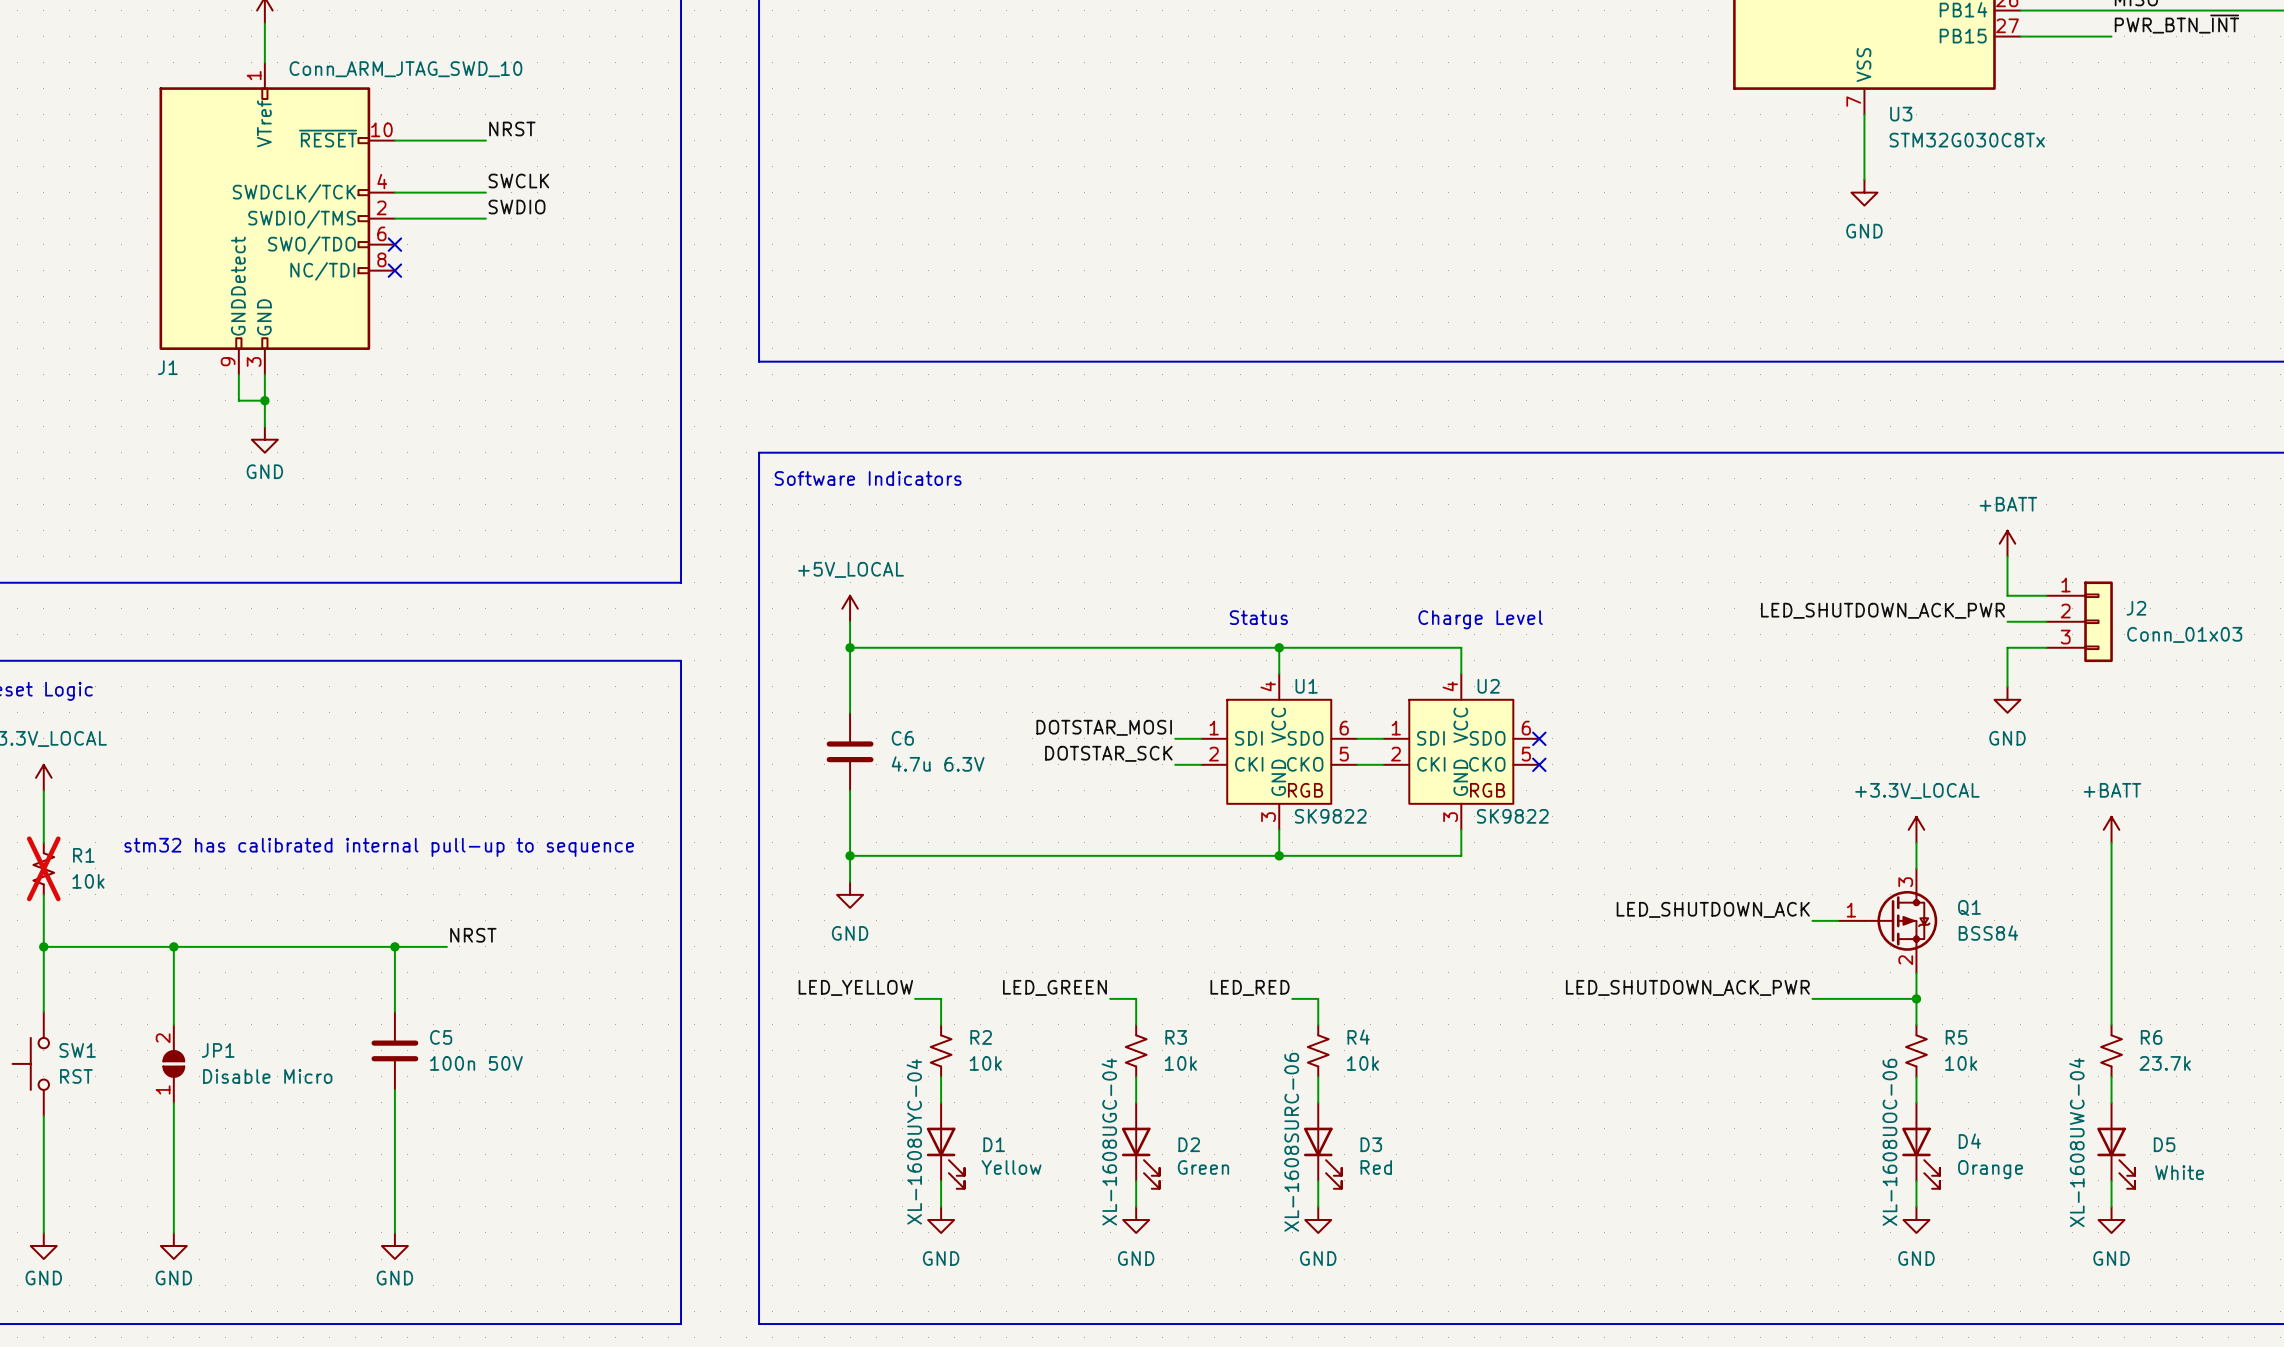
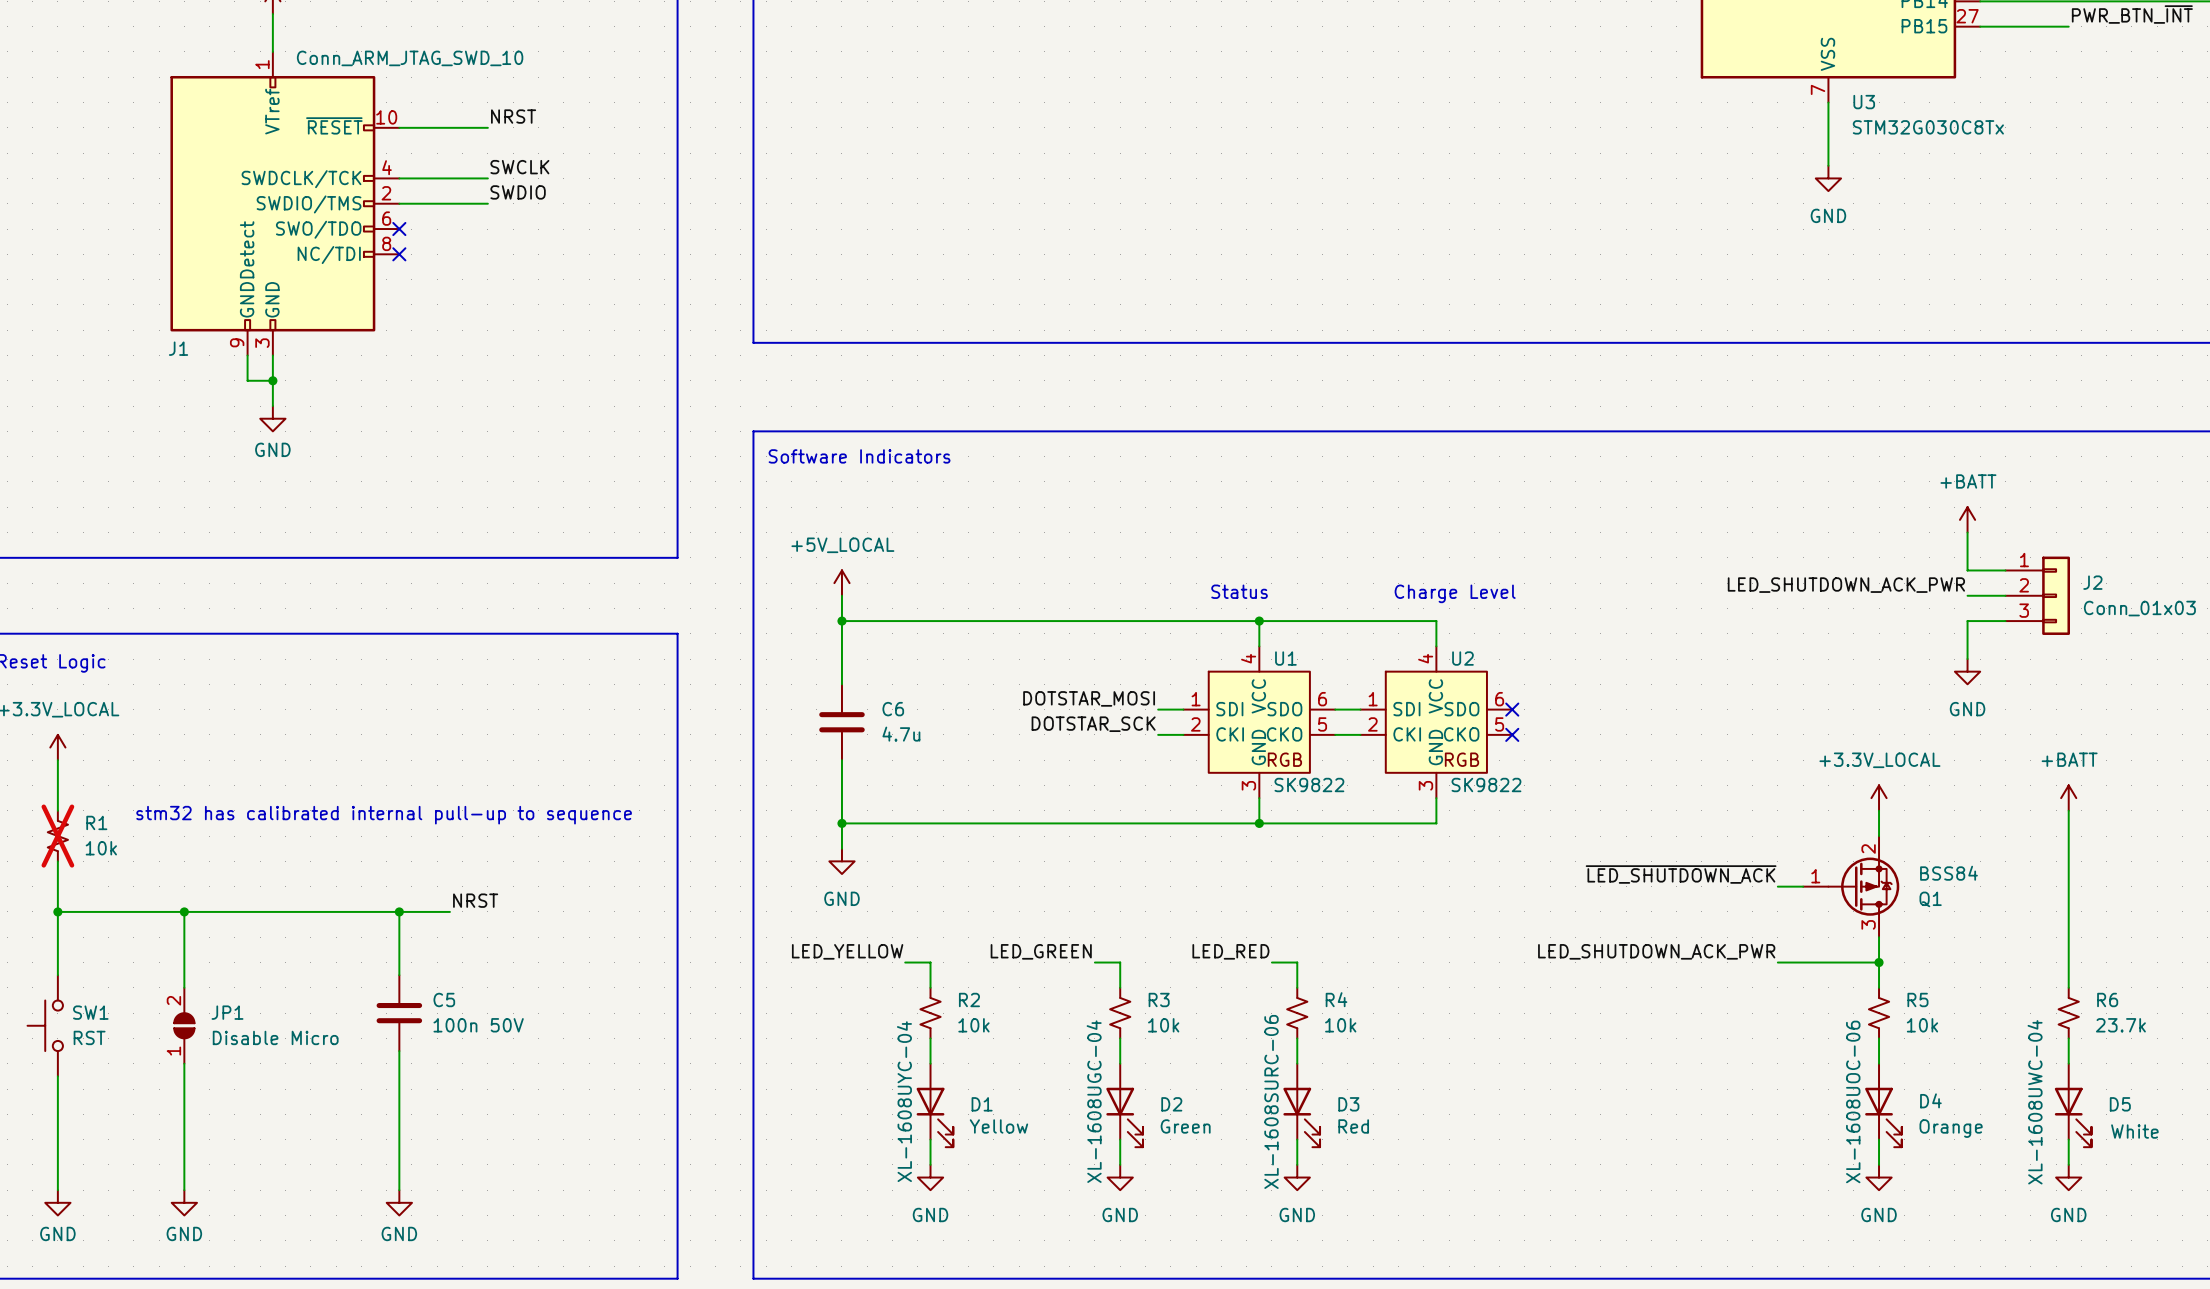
C6 value: 4.7u 6.3V (938, 764) -> 4.7u (901, 734)
label: LED_SHUTDOWN_ACK (1713, 909) -> ~{LED_SHUTDOWN_ACK} (1681, 874)
Q1 flip: as is (1900, 920) -> up-down (1863, 886)

